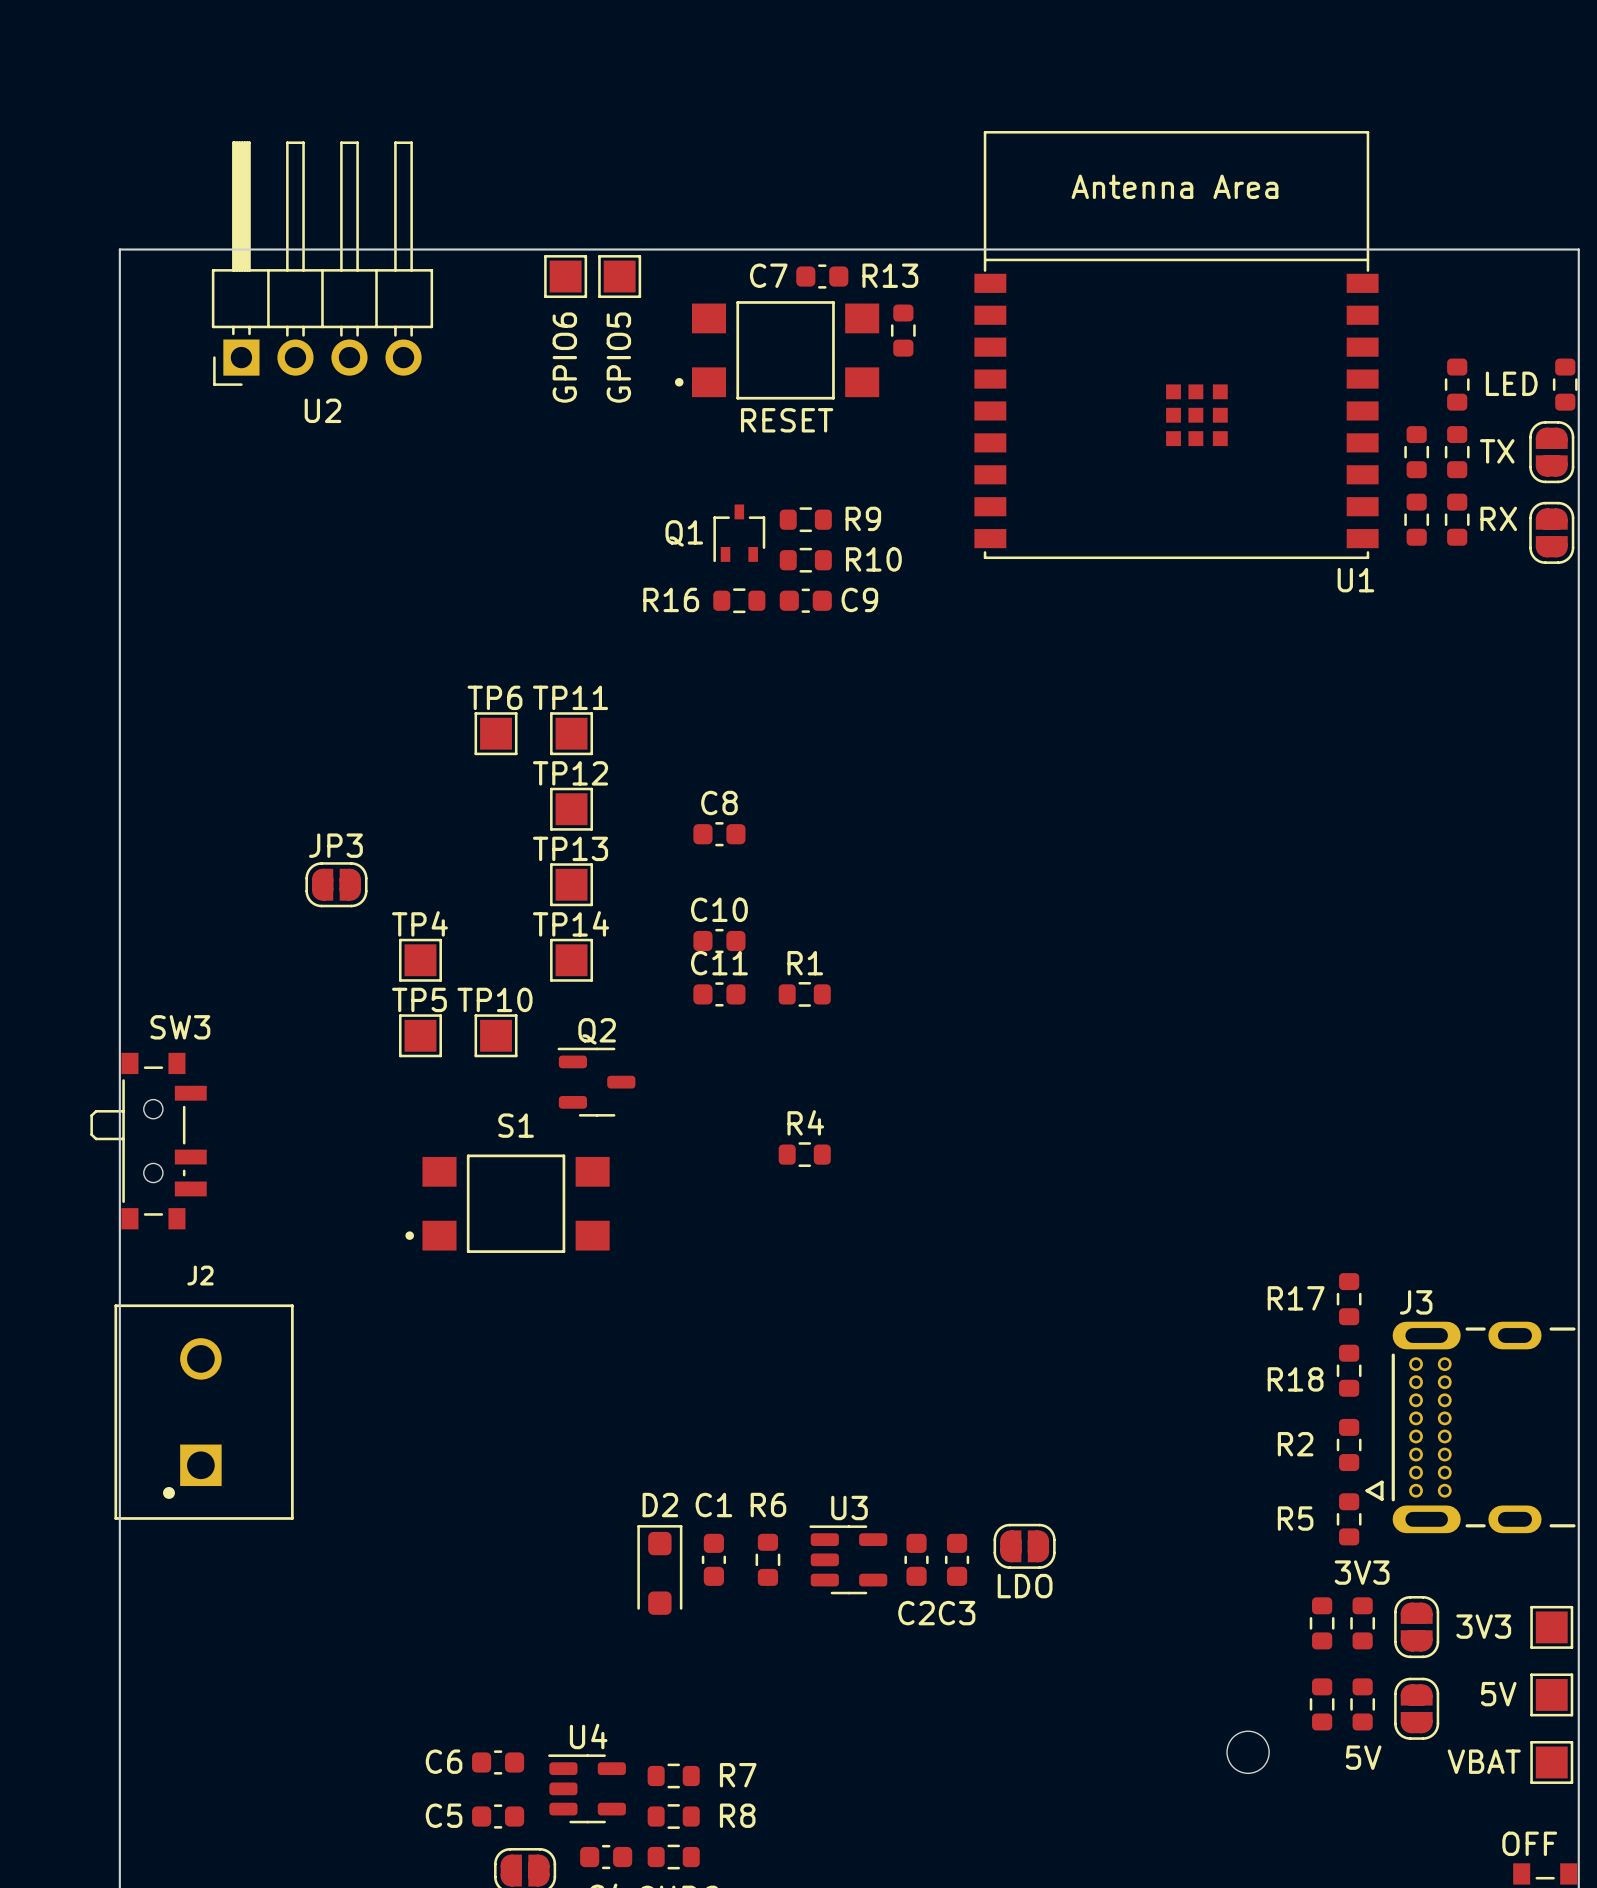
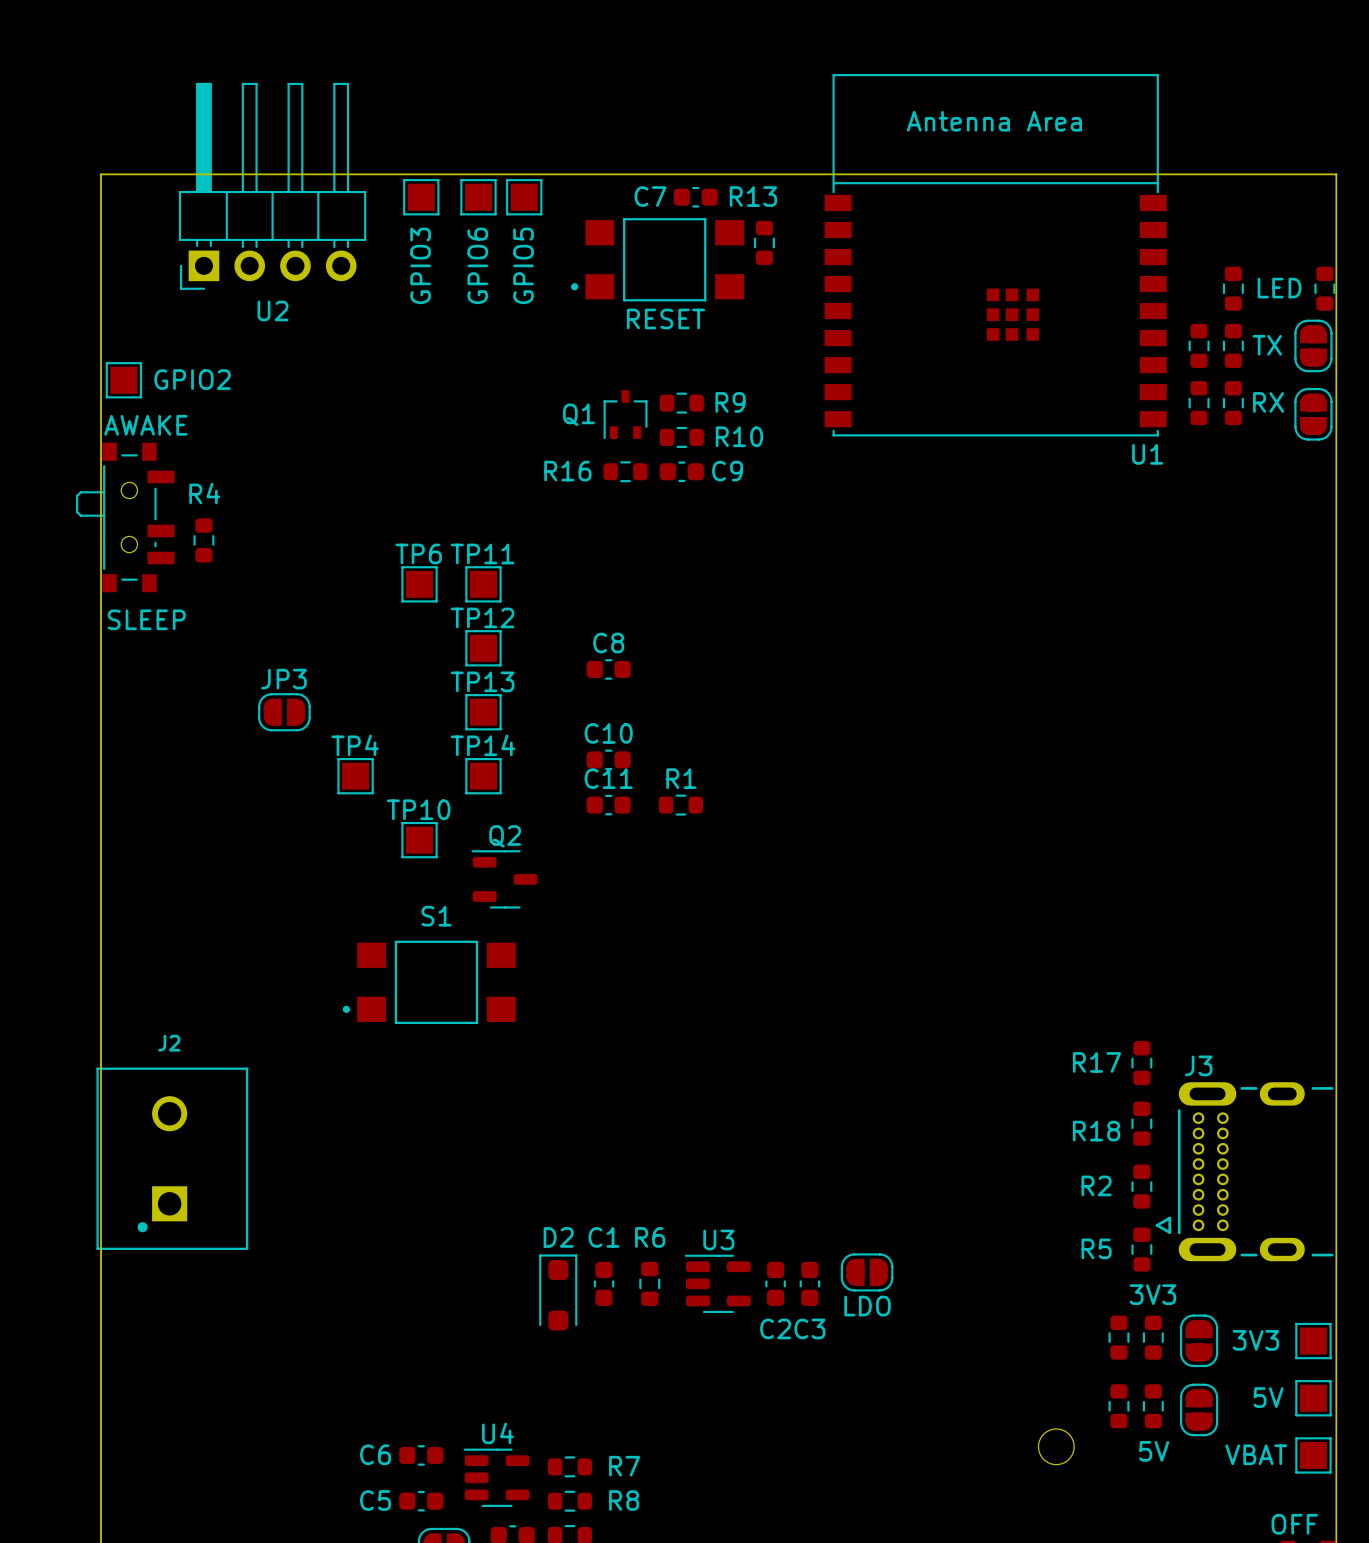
part: none -> (421, 197)
part: none -> (123, 380)
part: none -> (125, 517)
TP5: (420, 1035) -> none
SW3: (148, 1141) -> none
R4 rotation: 0° (804, 1154) -> 90° clockwise (203, 540)
R4 position: (804, 1154) -> (203, 540)

